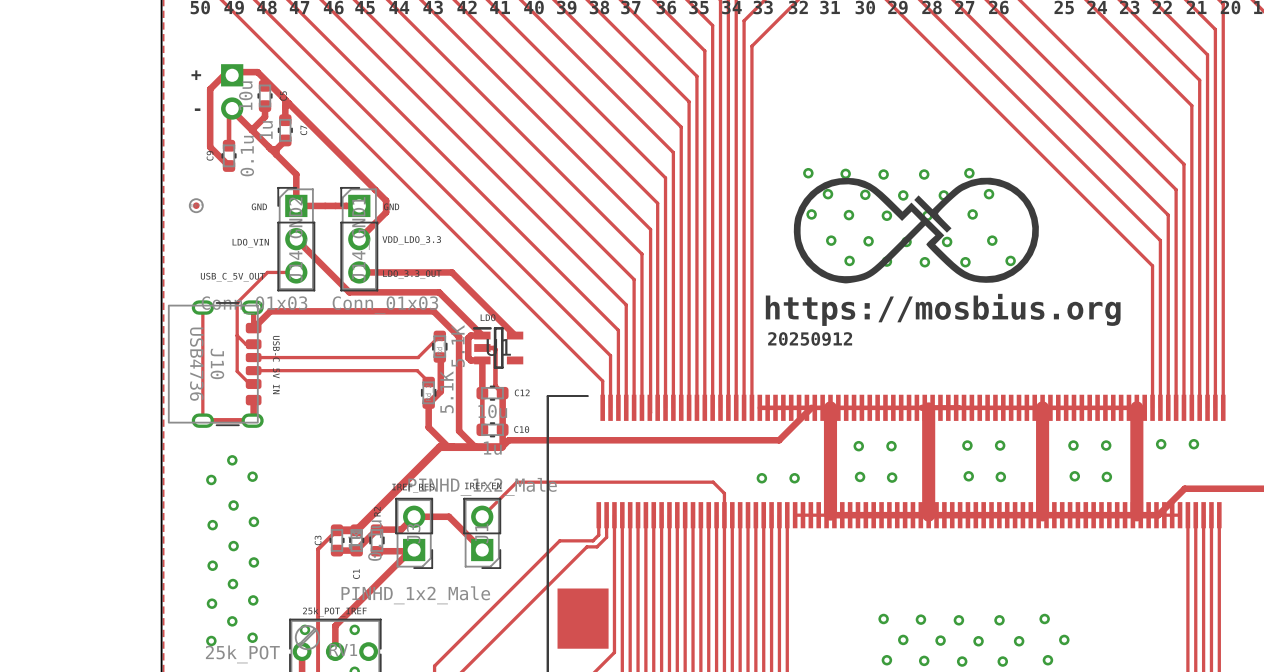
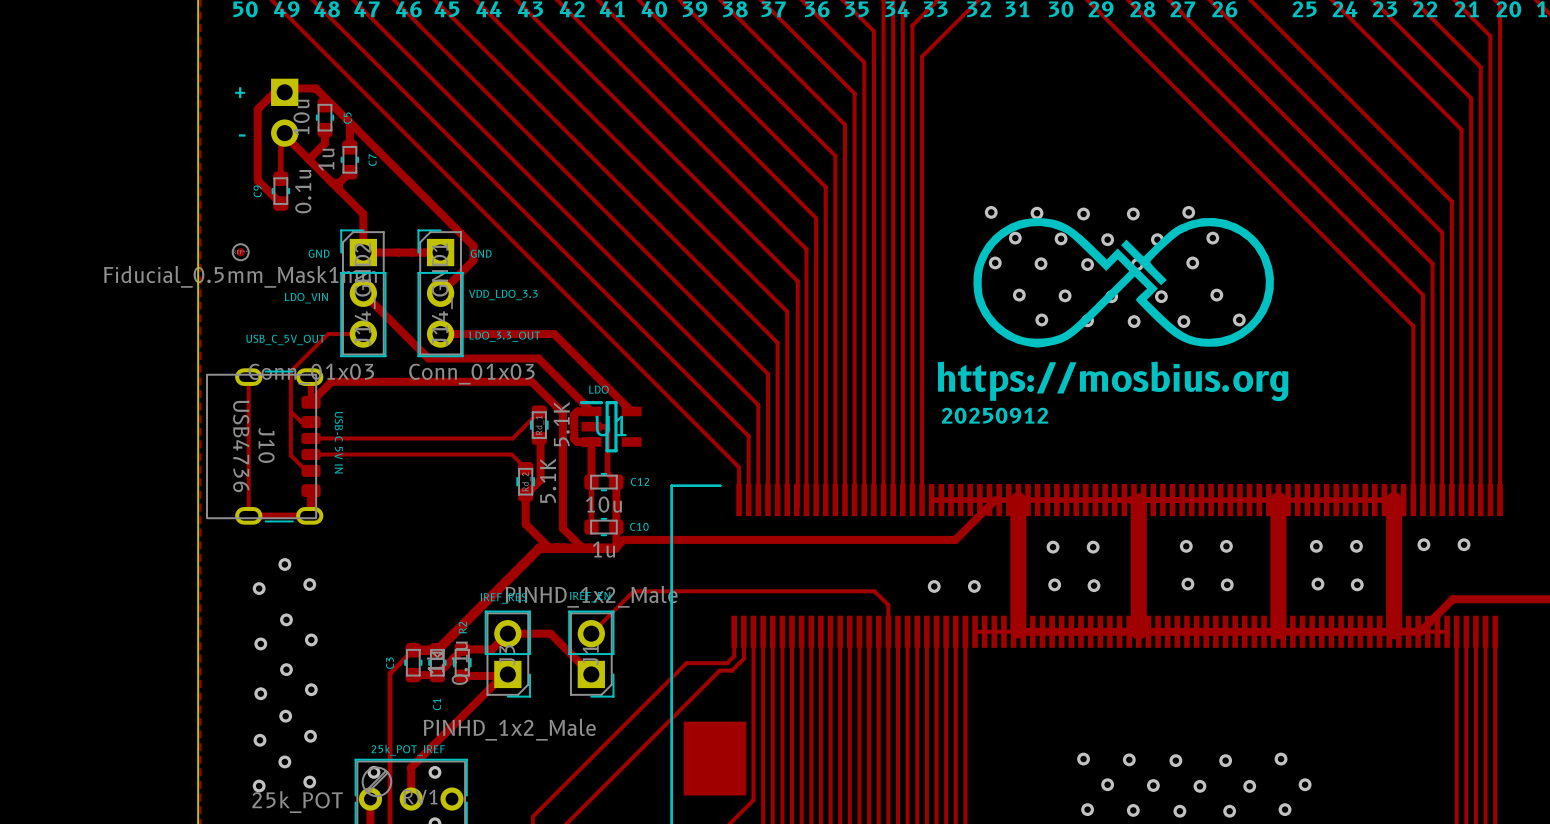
part value: none -> Fiducial_0.5mm_Mask1mm (240, 276)

